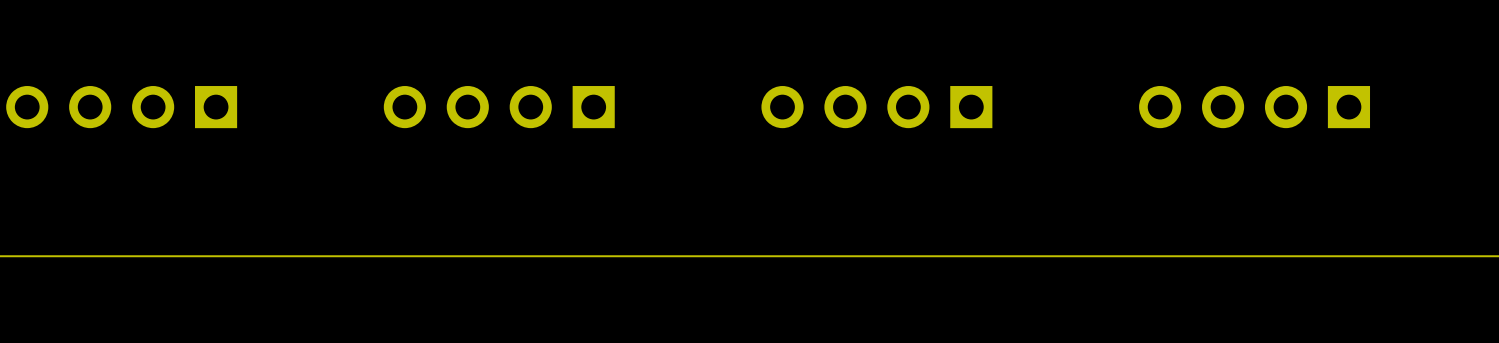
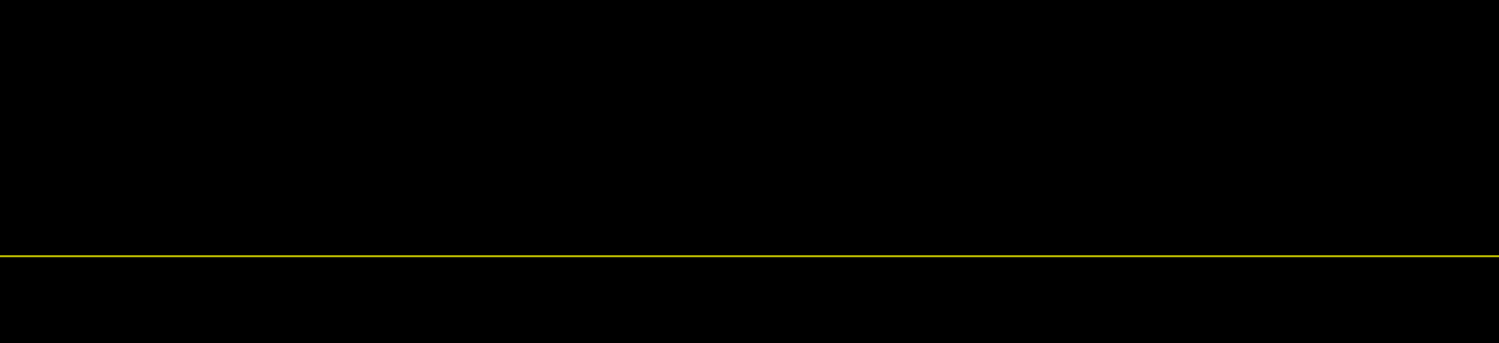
part: (121, 107) -> none
part: (499, 107) -> none
part: (876, 107) -> none
part: (1254, 107) -> none

